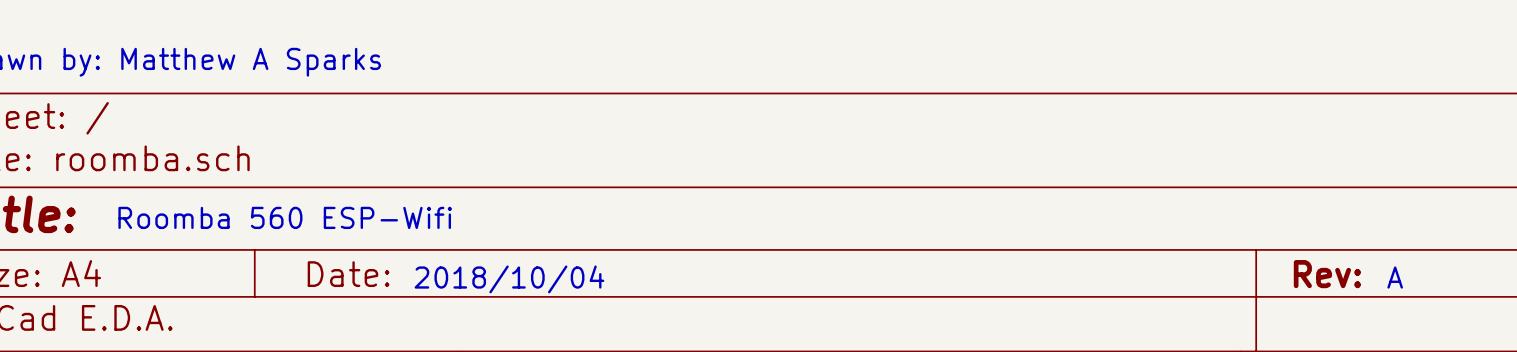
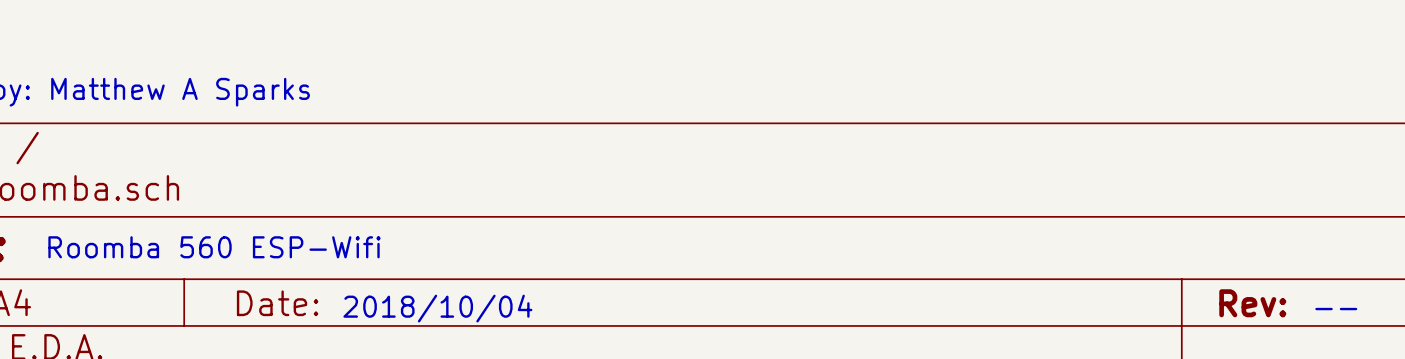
text: A (1395, 277) -> -- (1336, 309)

